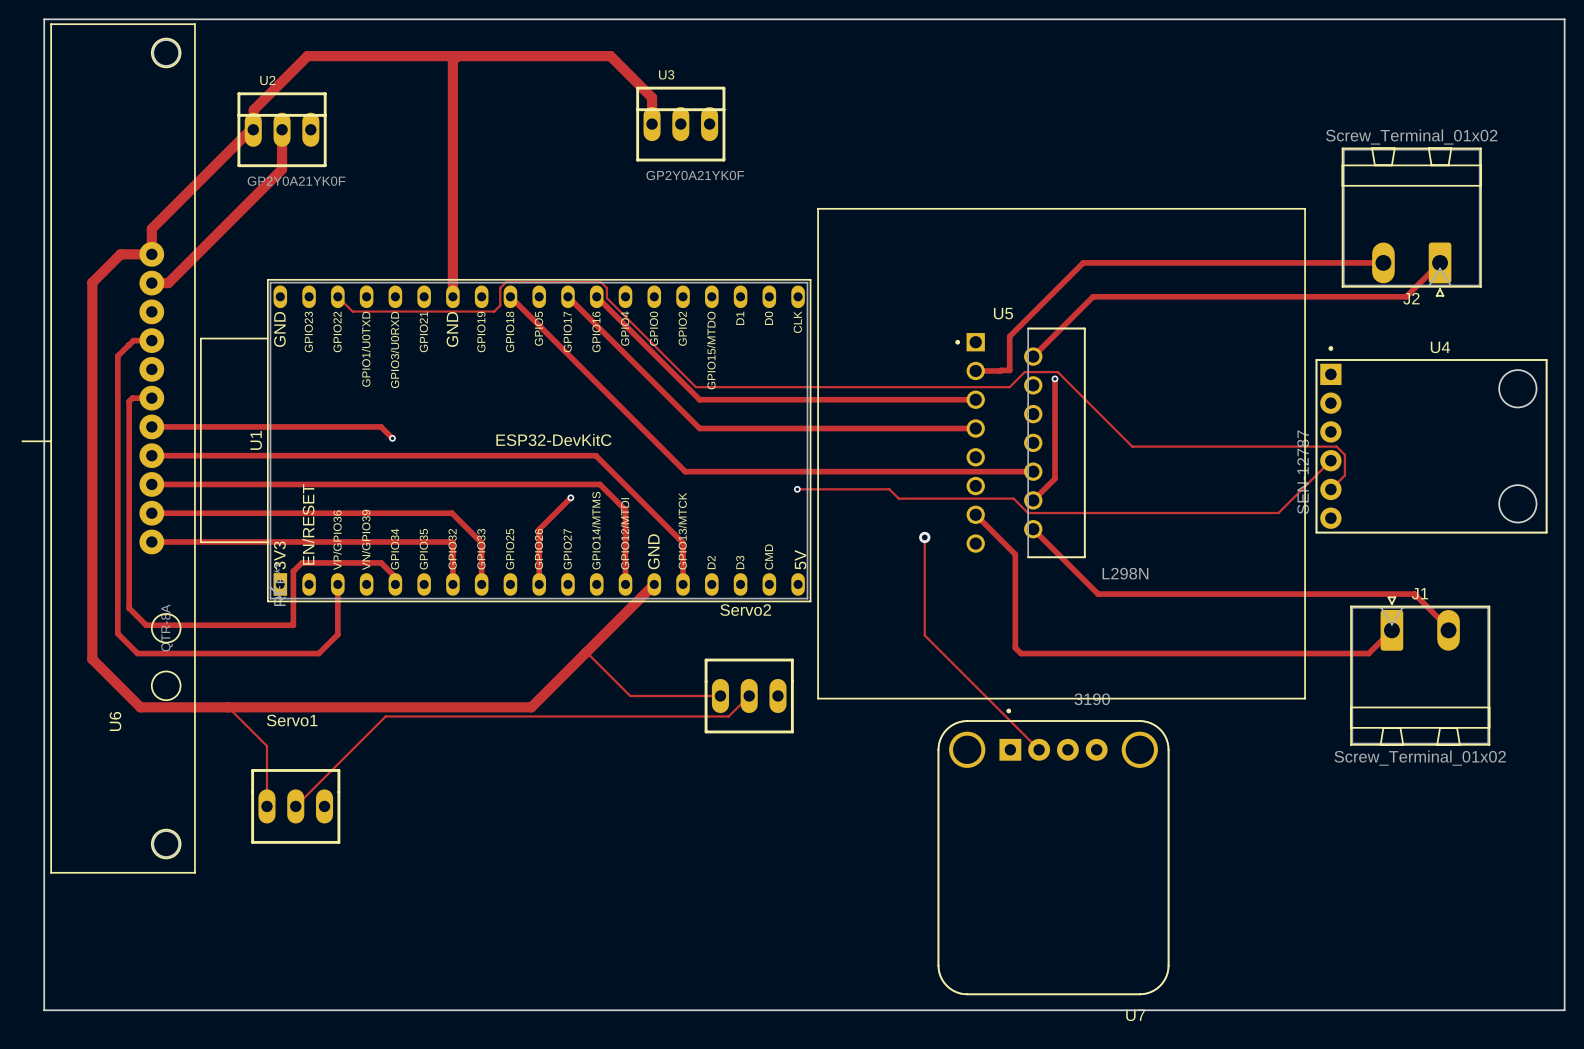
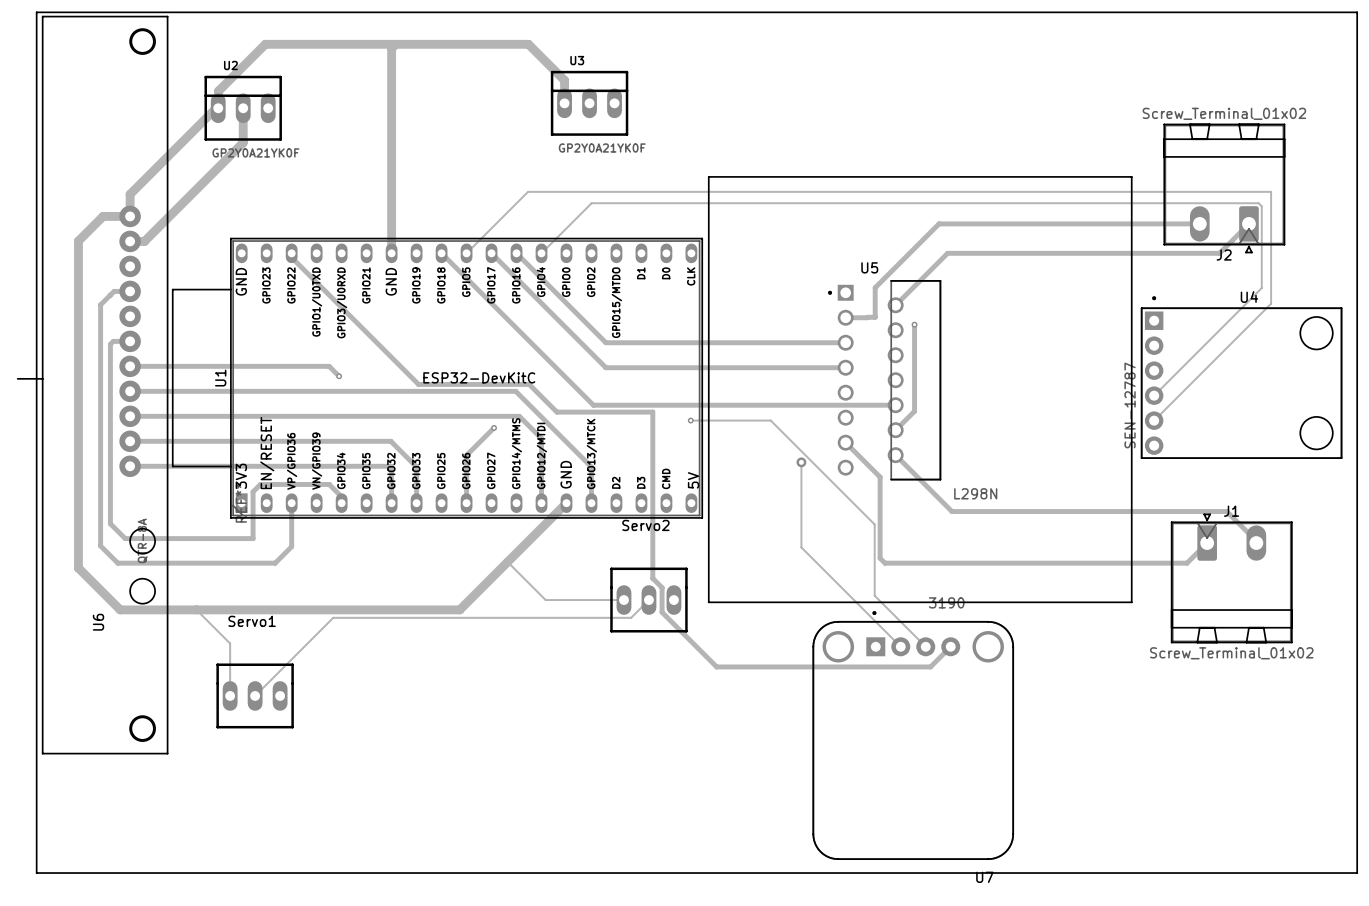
track: (337, 296) (352, 311) (494, 311) (500, 305) (500, 288) (506, 282) (600, 282) (606, 288) (606, 298) (695, 387) (1009, 387) (1024, 372) (1057, 372) (1132, 446) (1336, 446) (1344, 454) (1344, 475) -> (466, 253) (528, 191) (1271, 191) (1271, 303) (1166, 408)
track: none -> (291, 257) (418, 384) (529, 384) (556, 412) (652, 412) (652, 578) (662, 587) (662, 612) (716, 666) (930, 666) (950, 646)
track: (1330, 460) (1278, 513) (1028, 513) (1013, 498) (898, 498) -> (1154, 395) (1261, 288) (1261, 206) (1258, 203) (591, 203) (541, 253)
track: none -> (778, 428) (874, 524) (874, 595) (925, 646)

